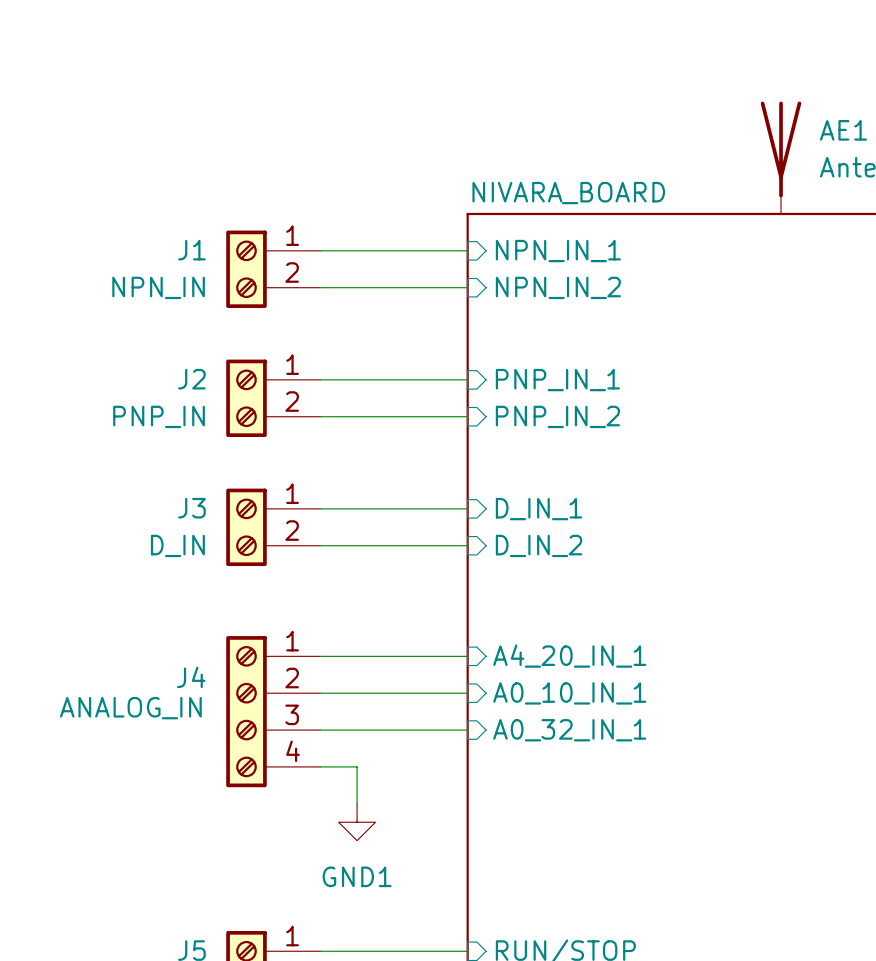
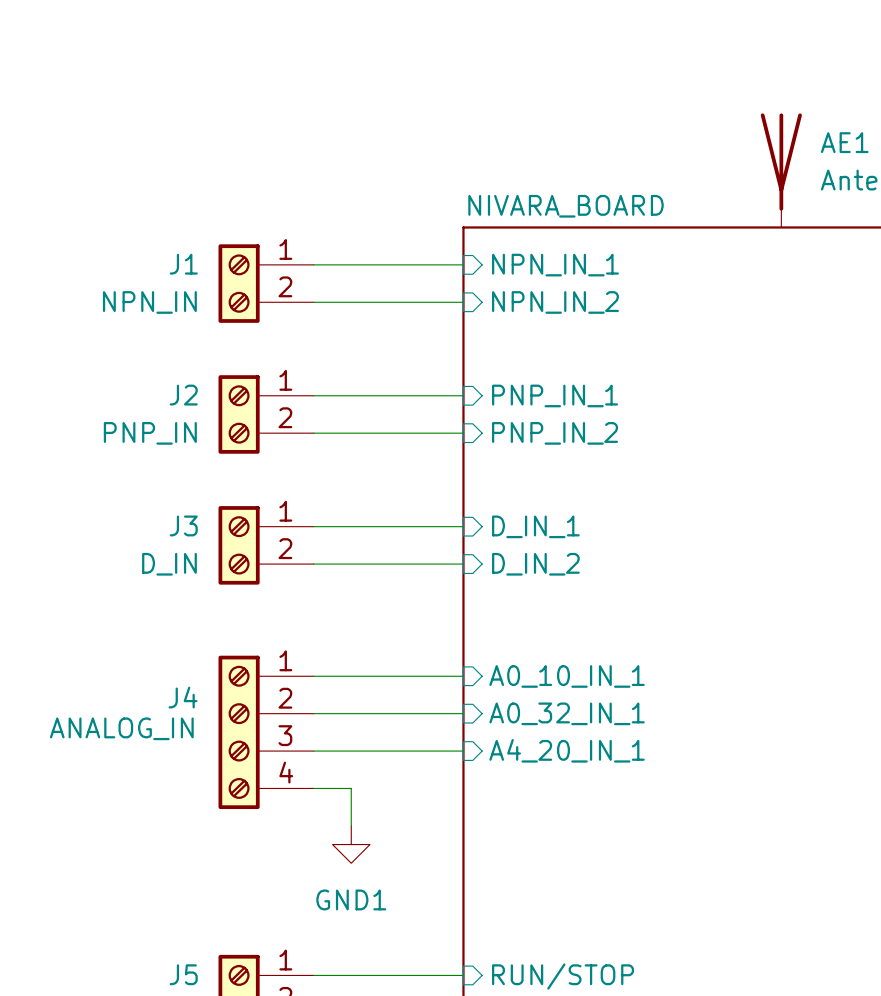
sheet pin: A4_20_IN_1 (569, 656) -> A0_10_IN_1 (567, 676)
sheet pin: A0_10_IN_1 (569, 693) -> A0_32_IN_1 (567, 713)
sheet pin: A0_32_IN_1 (569, 730) -> A4_20_IN_1 (567, 750)

